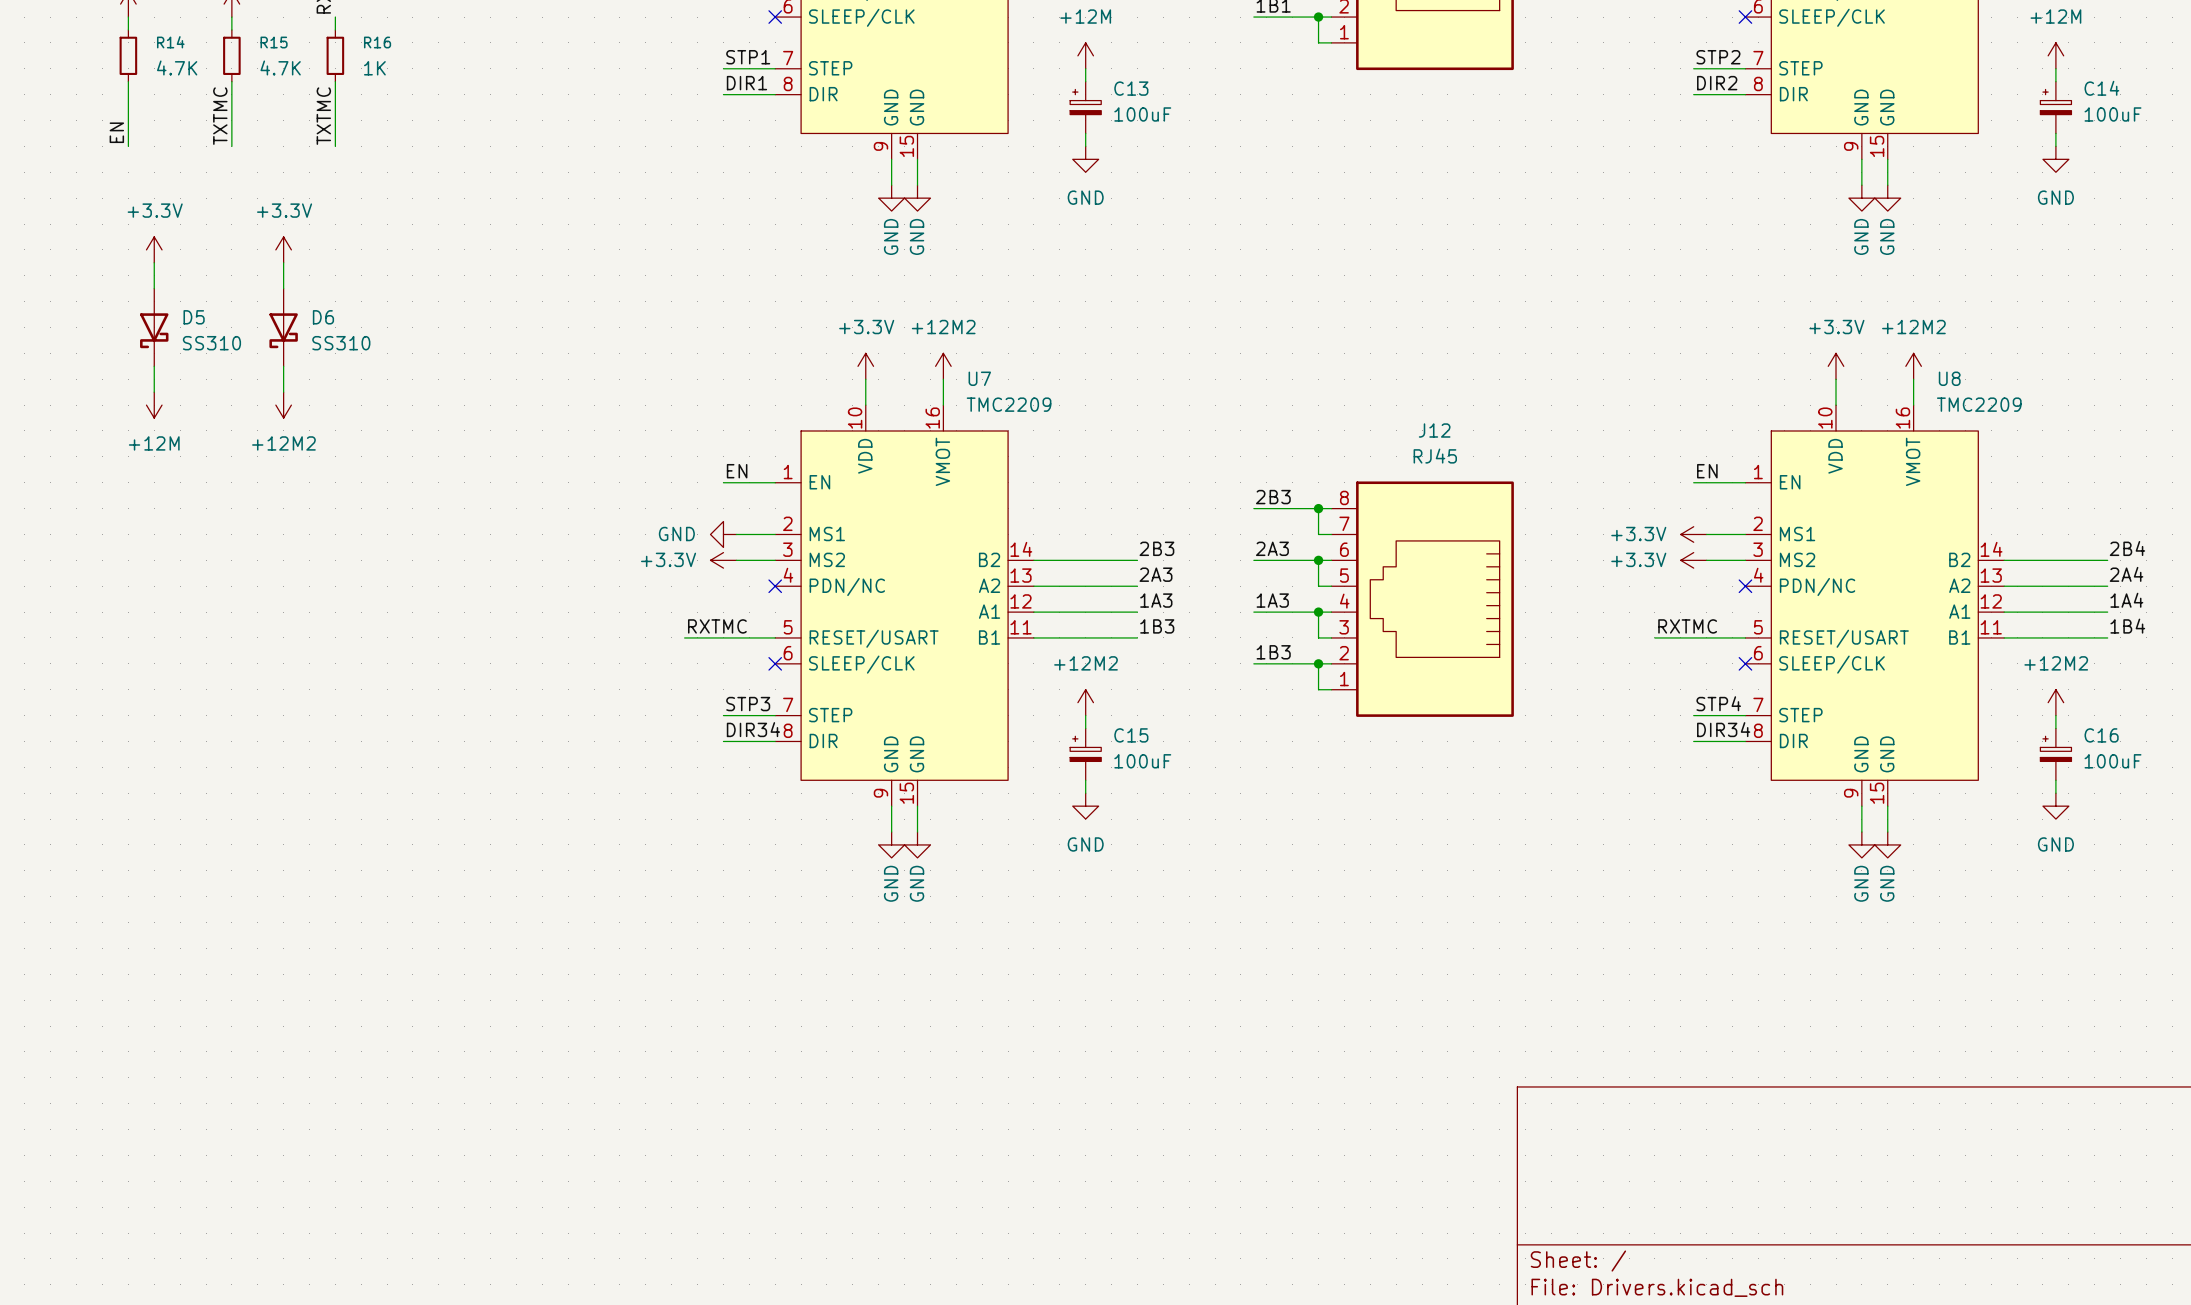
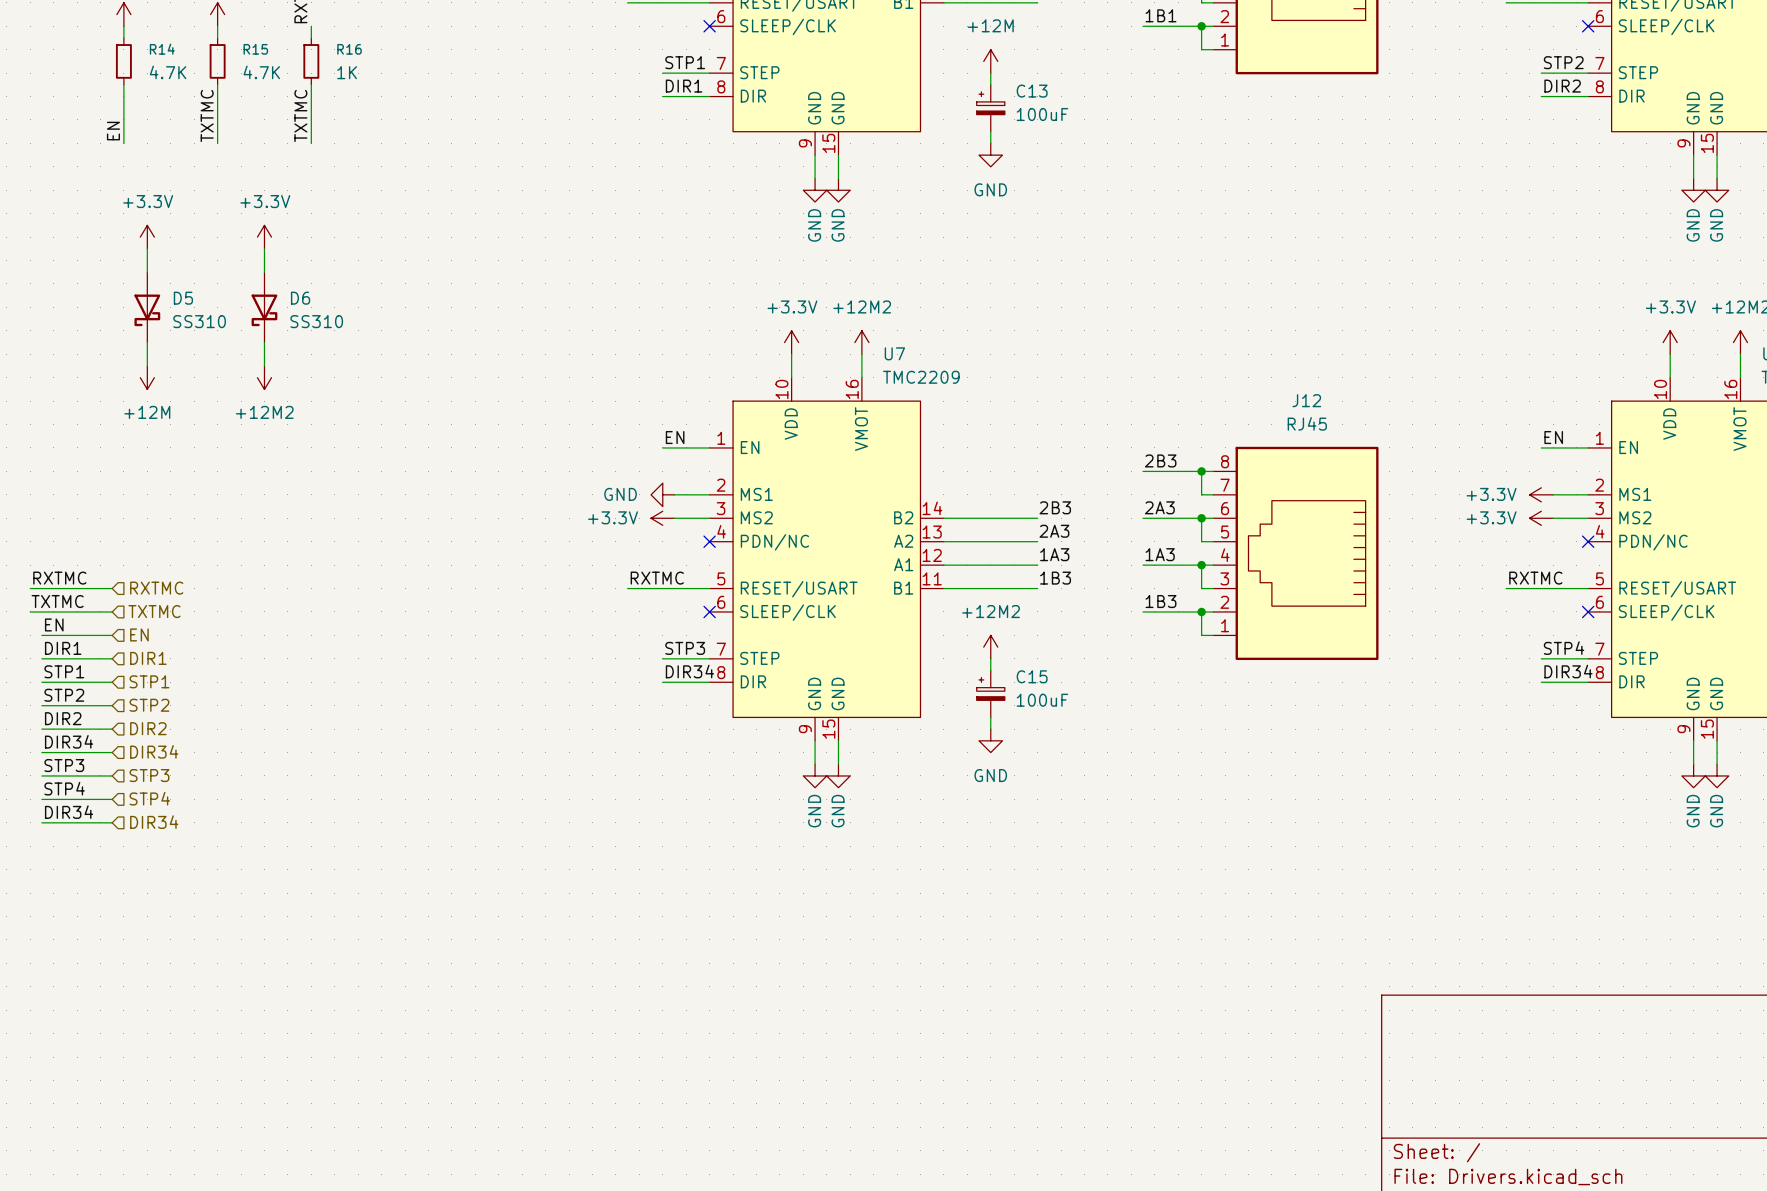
label: none -> RXTMC (59, 578)
wire: none -> (30, 588) (112, 588)
hierarchical label: none -> RXTMC (156, 588)
label: none -> TXTMC (57, 601)
wire: none -> (30, 611) (112, 611)
hierarchical label: none -> TXTMC (154, 611)
label: none -> EN (54, 624)
wire: none -> (41, 635) (112, 635)
hierarchical label: none -> EN (139, 634)
label: none -> DIR1 (63, 648)
wire: none -> (41, 658) (112, 658)
hierarchical label: none -> DIR1 (148, 658)
label: none -> STP1 (64, 671)
hierarchical label: none -> STP1 (149, 681)
wire: none -> (41, 682) (112, 682)
label: none -> STP2 (64, 695)
hierarchical label: none -> STP2 (149, 705)
wire: none -> (41, 705) (112, 705)
label: none -> DIR2 (63, 718)
hierarchical label: none -> DIR2 (148, 728)
wire: none -> (41, 729) (112, 729)
label: none -> DIR34 (69, 741)
hierarchical label: none -> DIR34 (154, 751)
wire: none -> (41, 752) (112, 752)
label: none -> STP3 (64, 765)
wire: none -> (41, 775) (112, 775)
hierarchical label: none -> STP3 (149, 775)
label: none -> STP4 (64, 788)
wire: none -> (41, 799) (112, 799)
hierarchical label: none -> STP4 (149, 798)
label: none -> DIR34 (69, 812)
hierarchical label: none -> DIR34 (154, 822)
wire: none -> (41, 822) (112, 822)

